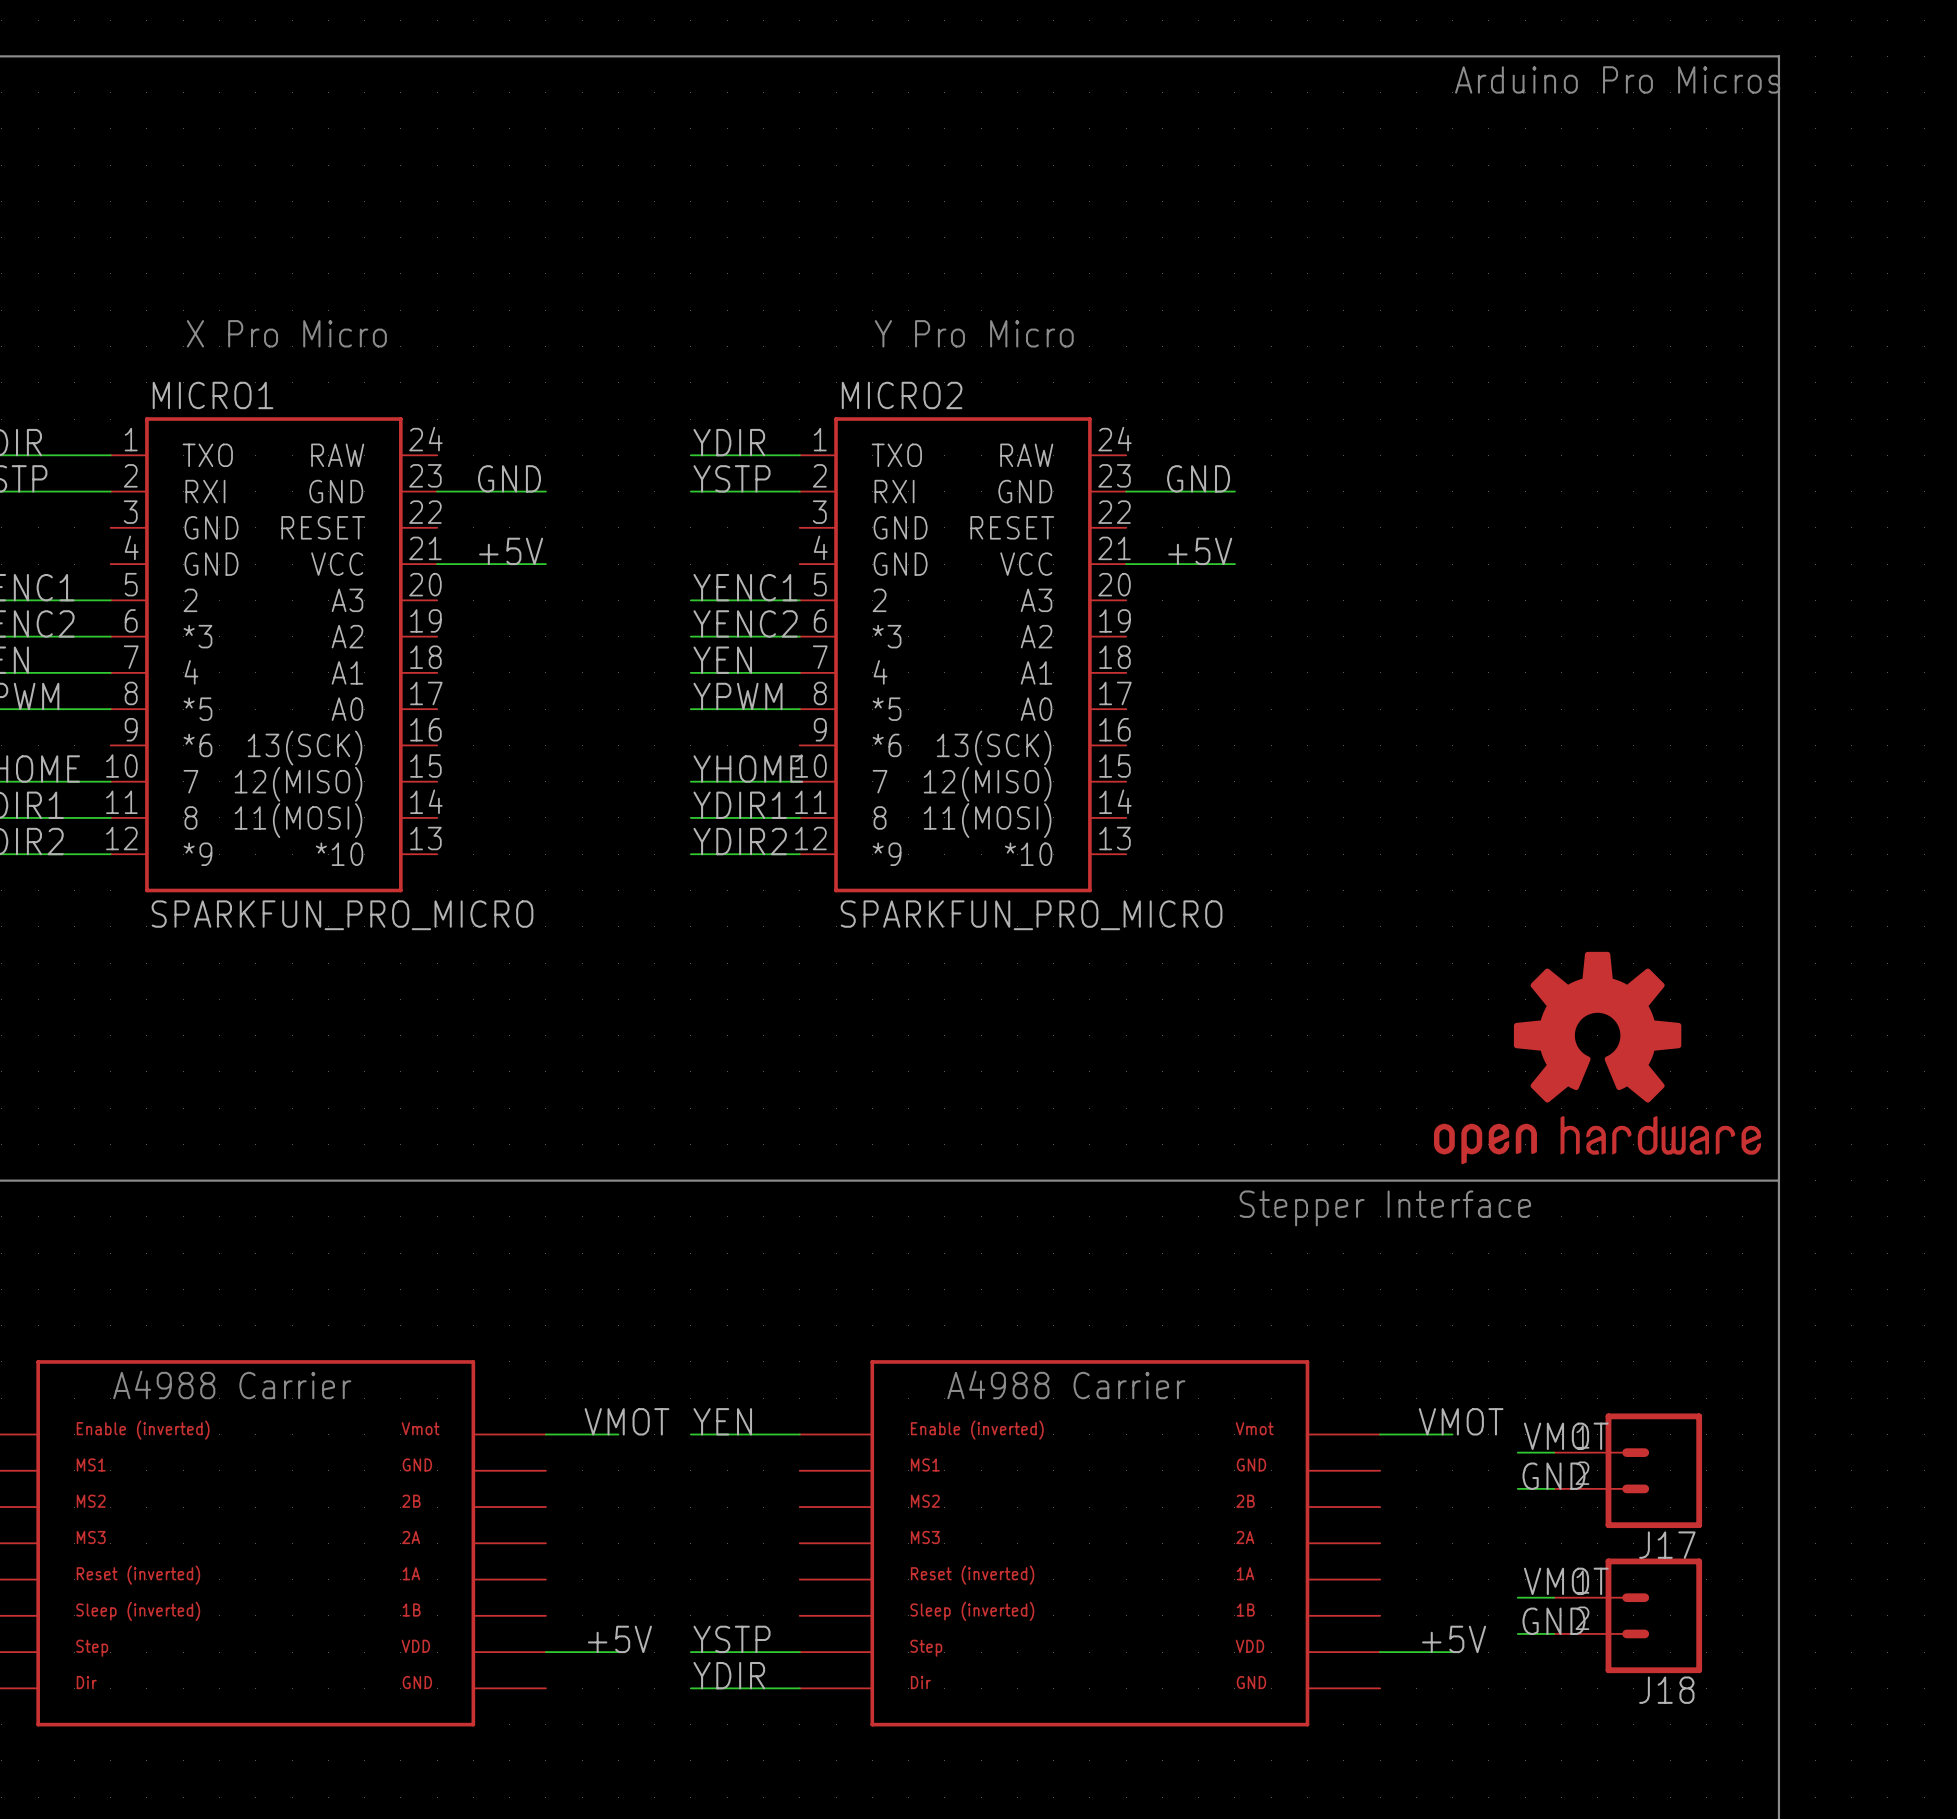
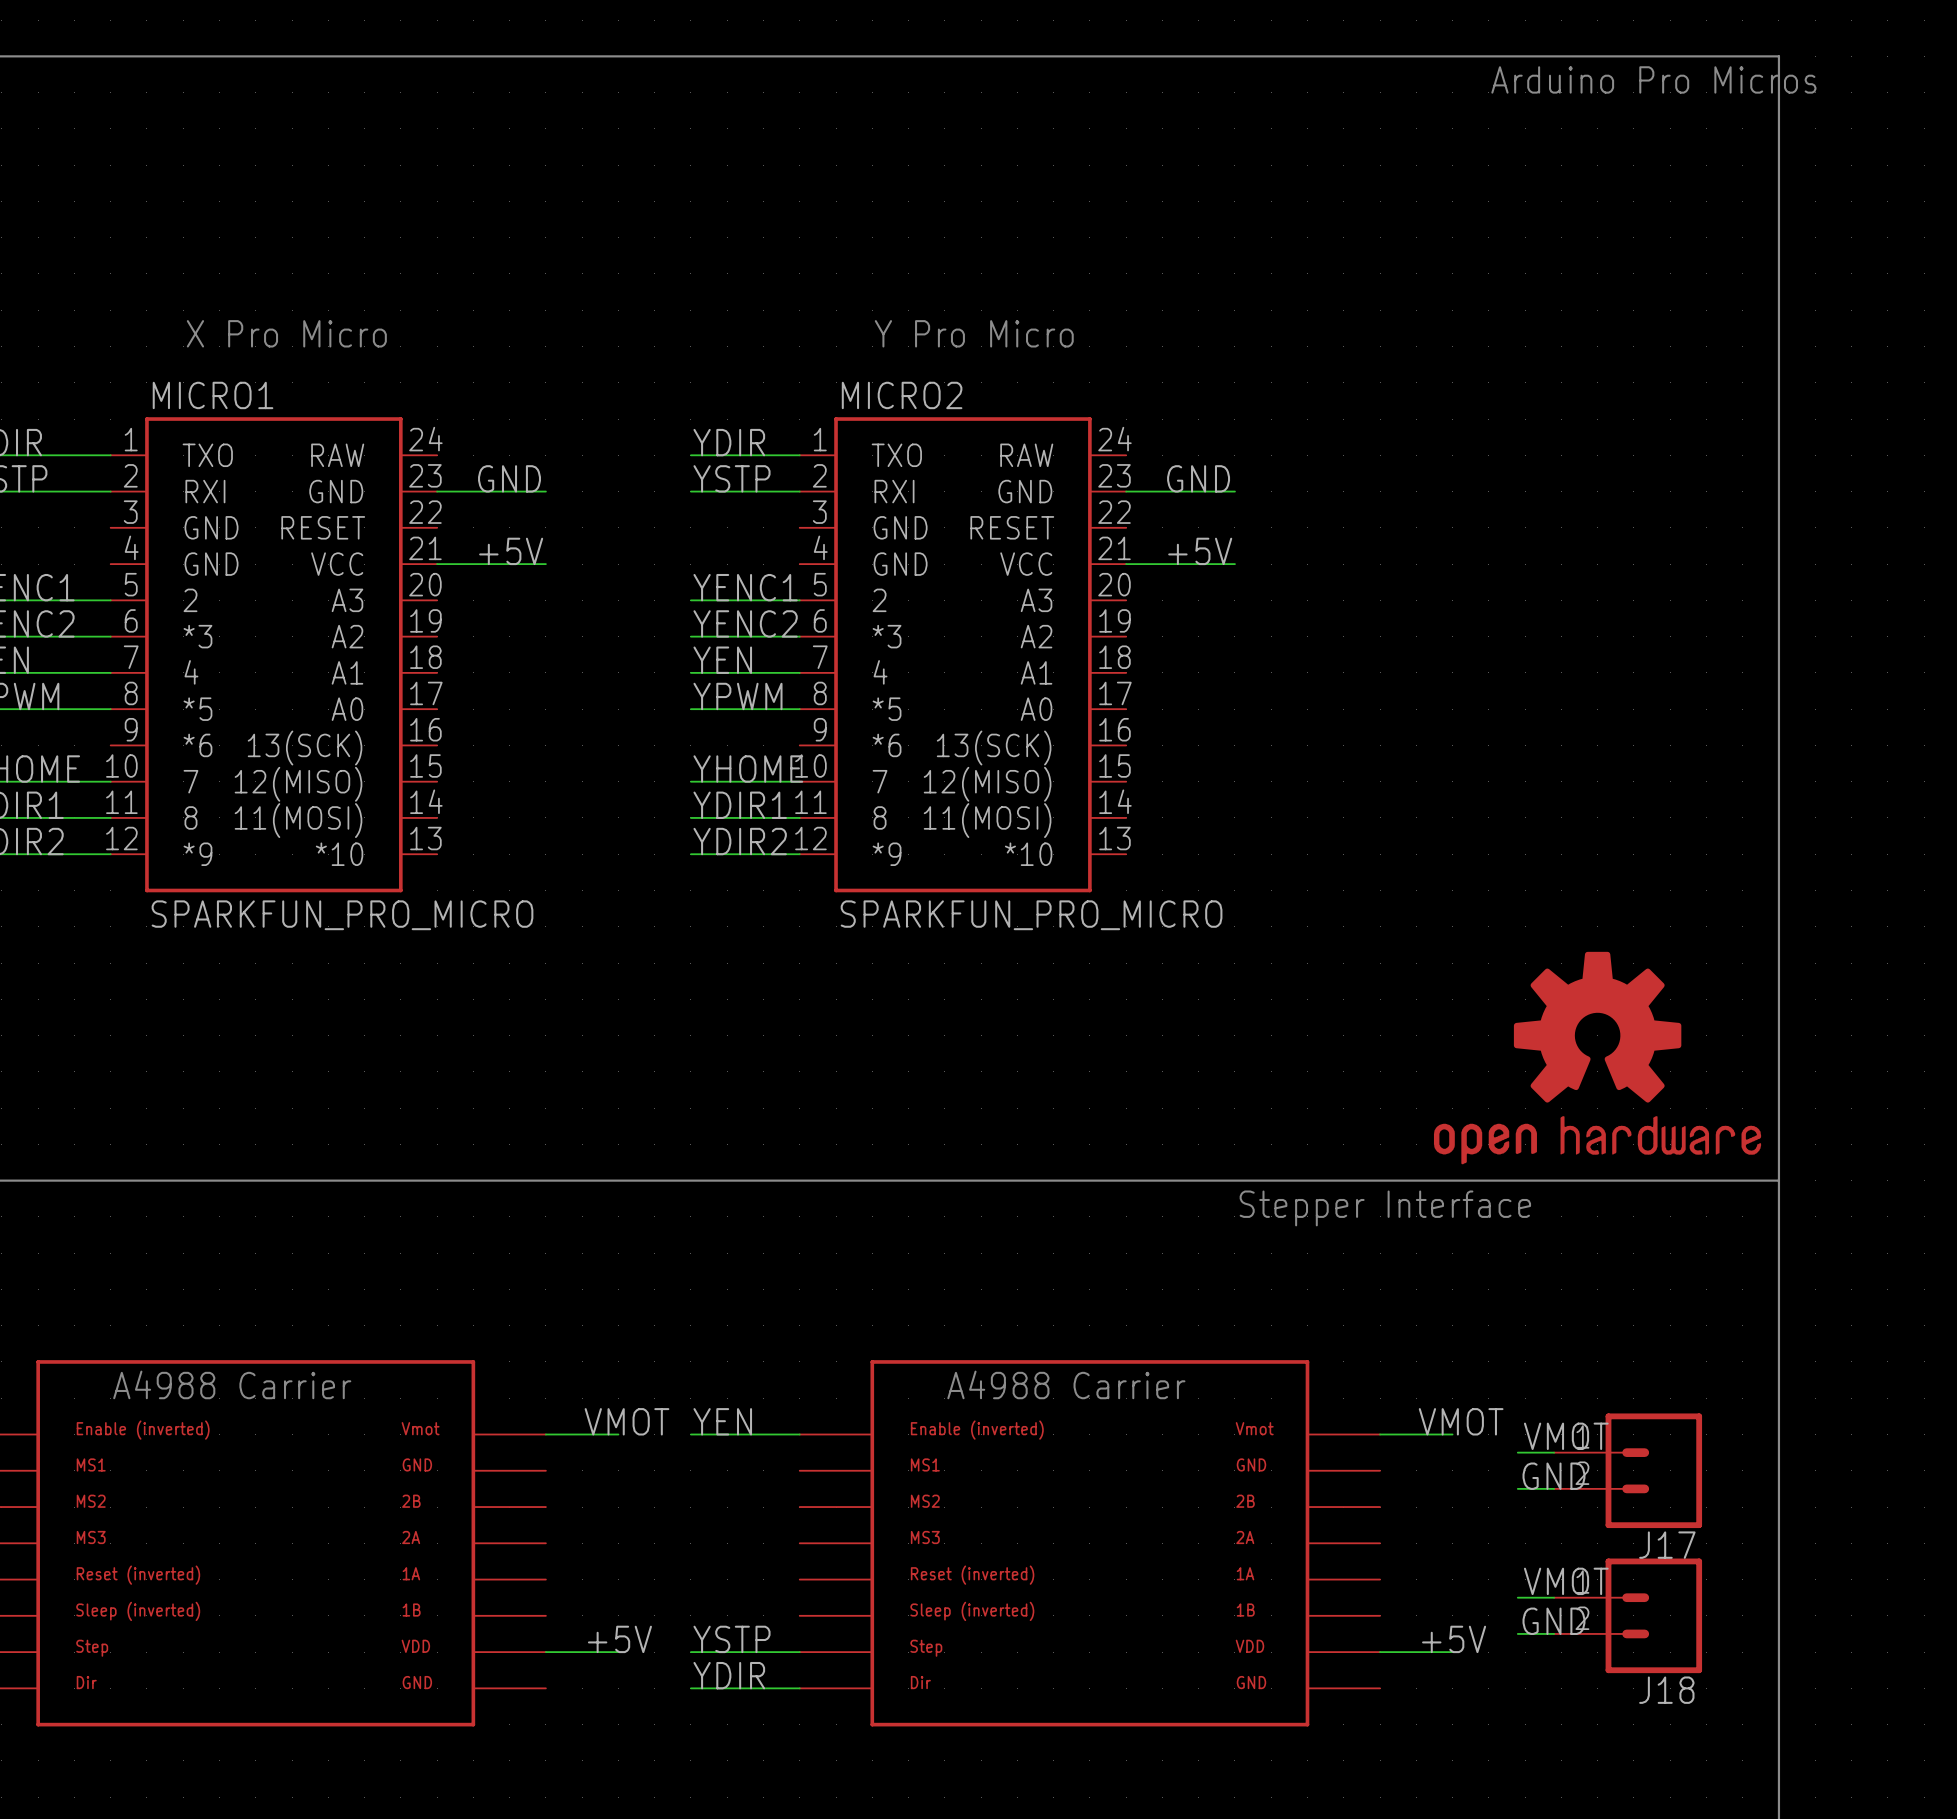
text position: Arduino Pro Micros (1617, 79) -> Arduino Pro Micros (1653, 79)

